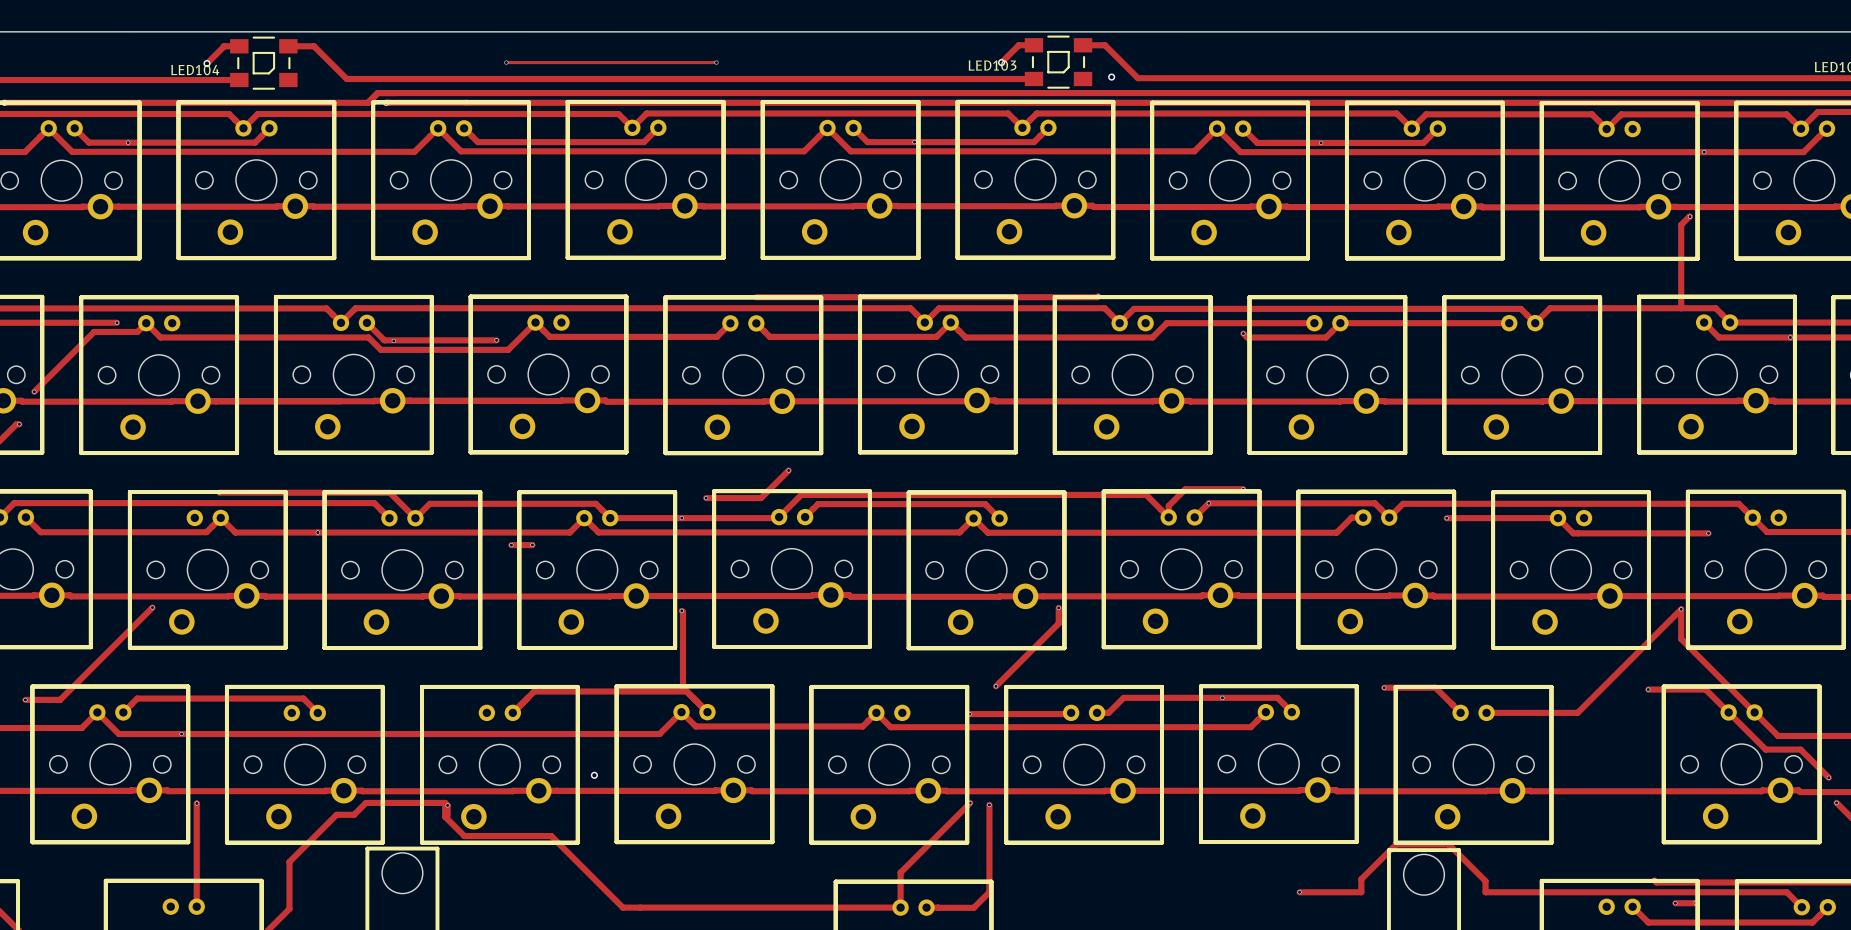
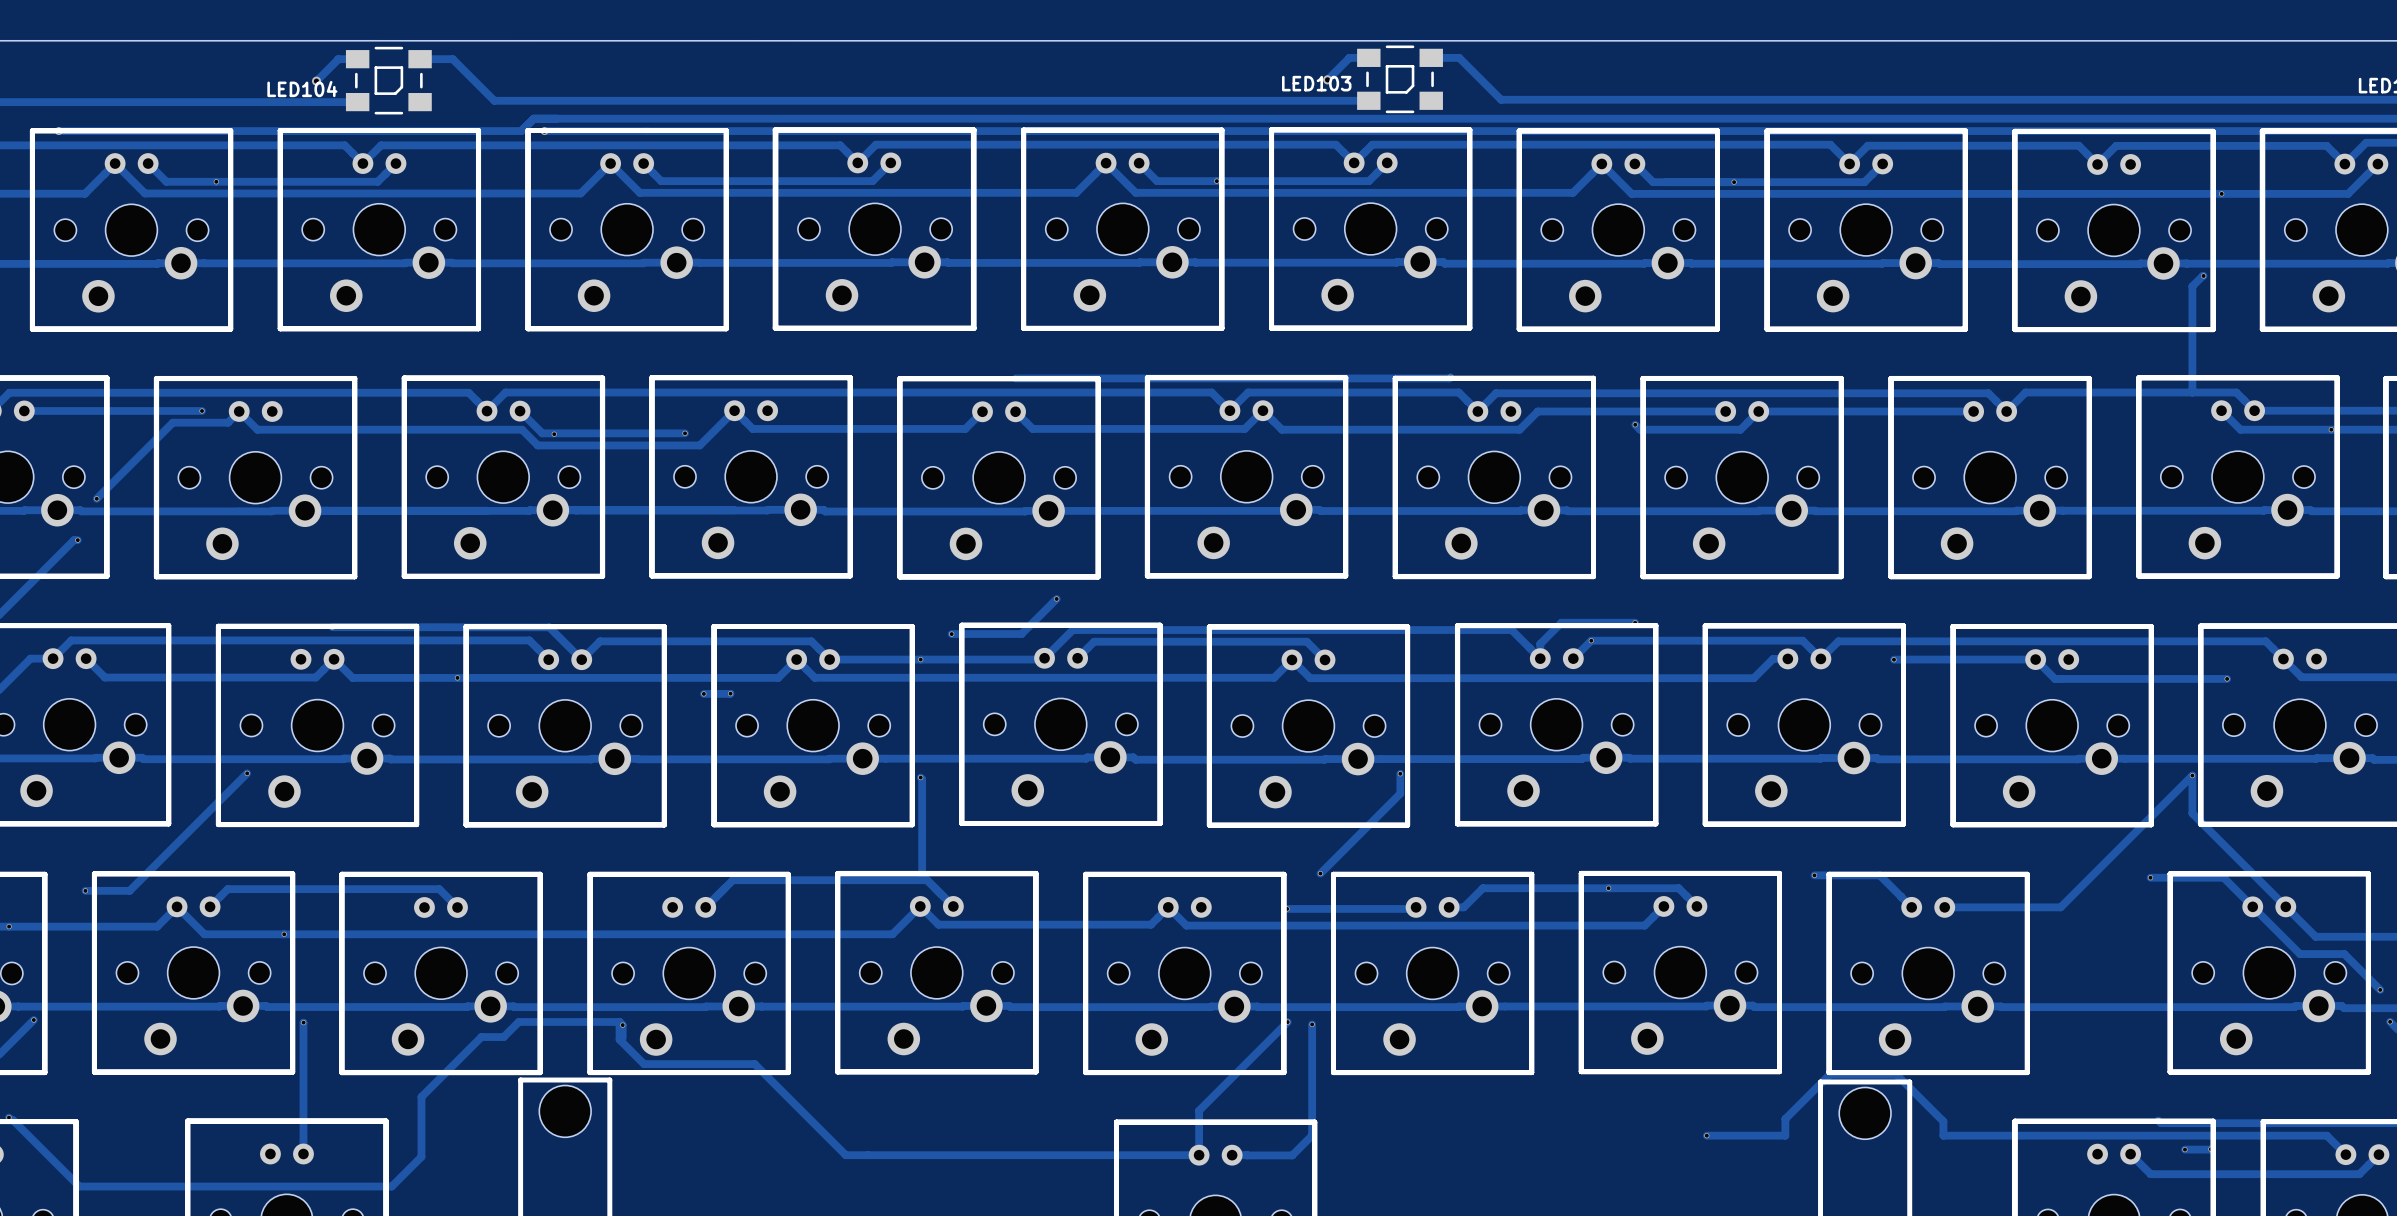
track: (506, 62) (716, 62) -> none
via: (506, 62) -> none
via: (716, 62) -> none
via: (1111, 77) -> none
via: (594, 775) -> none

